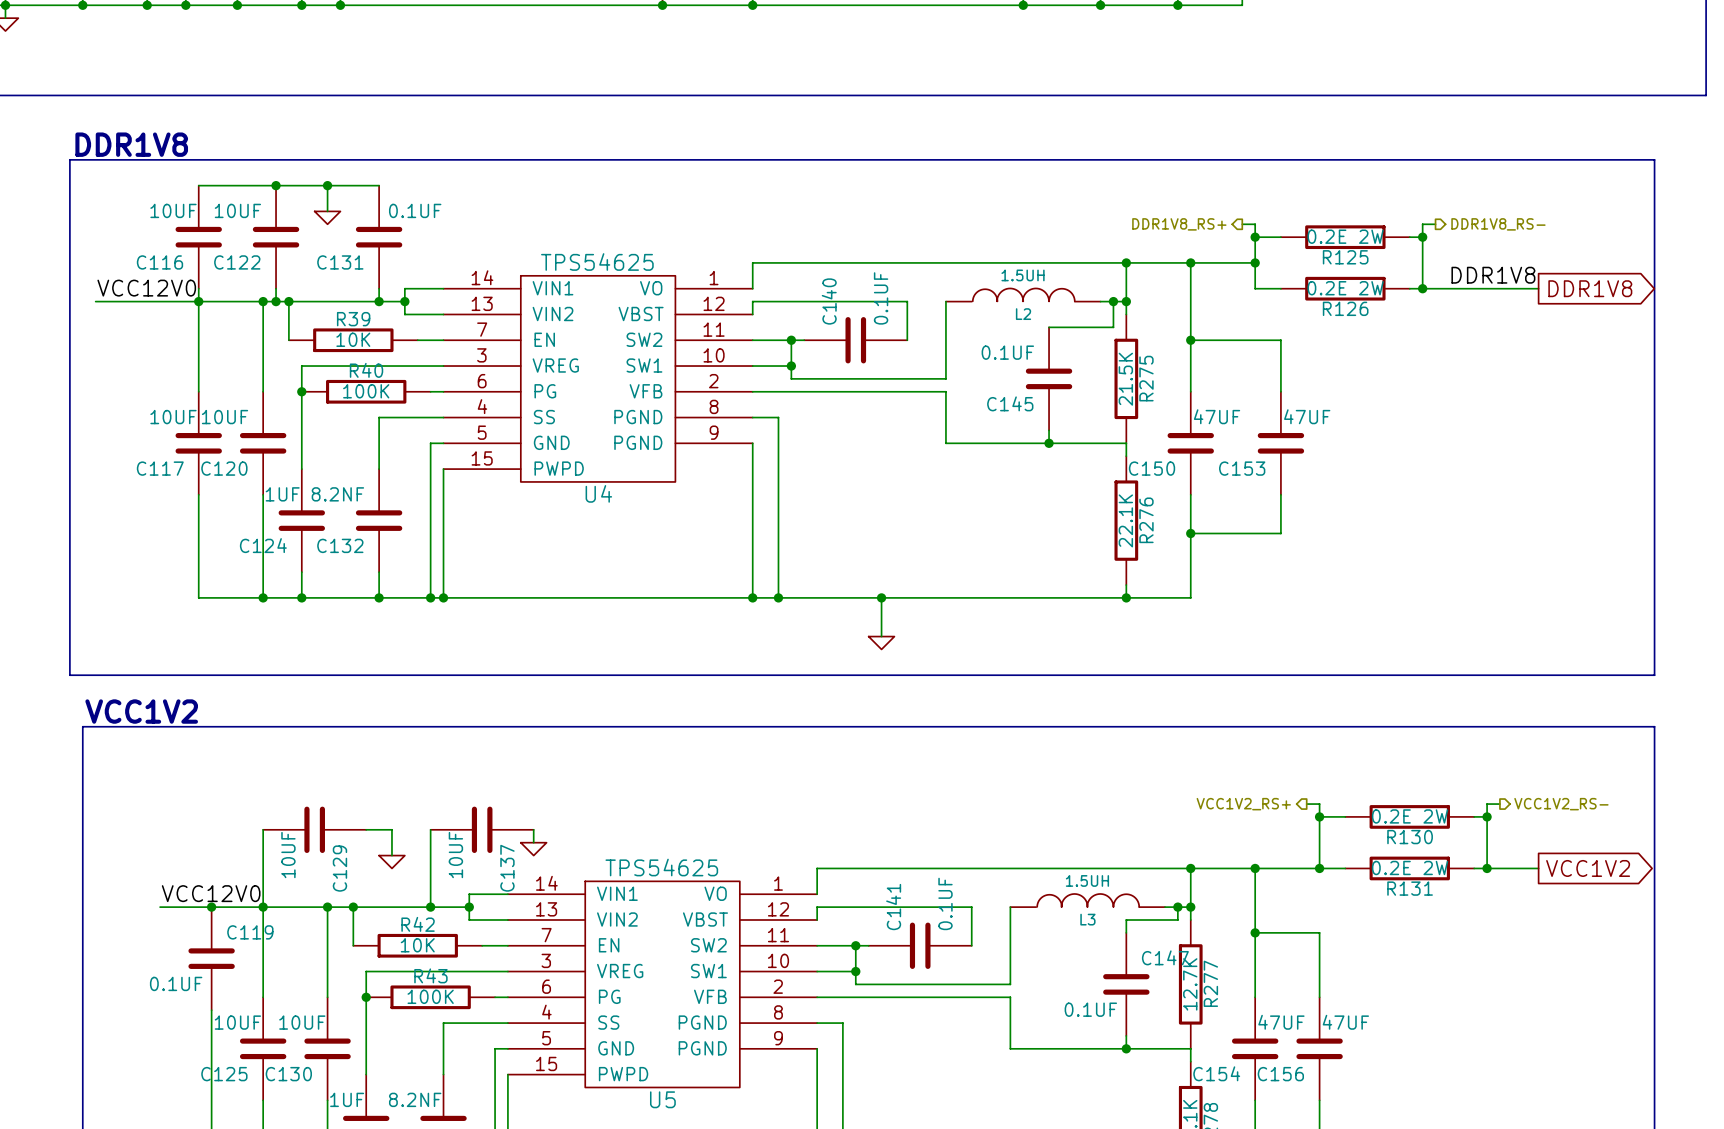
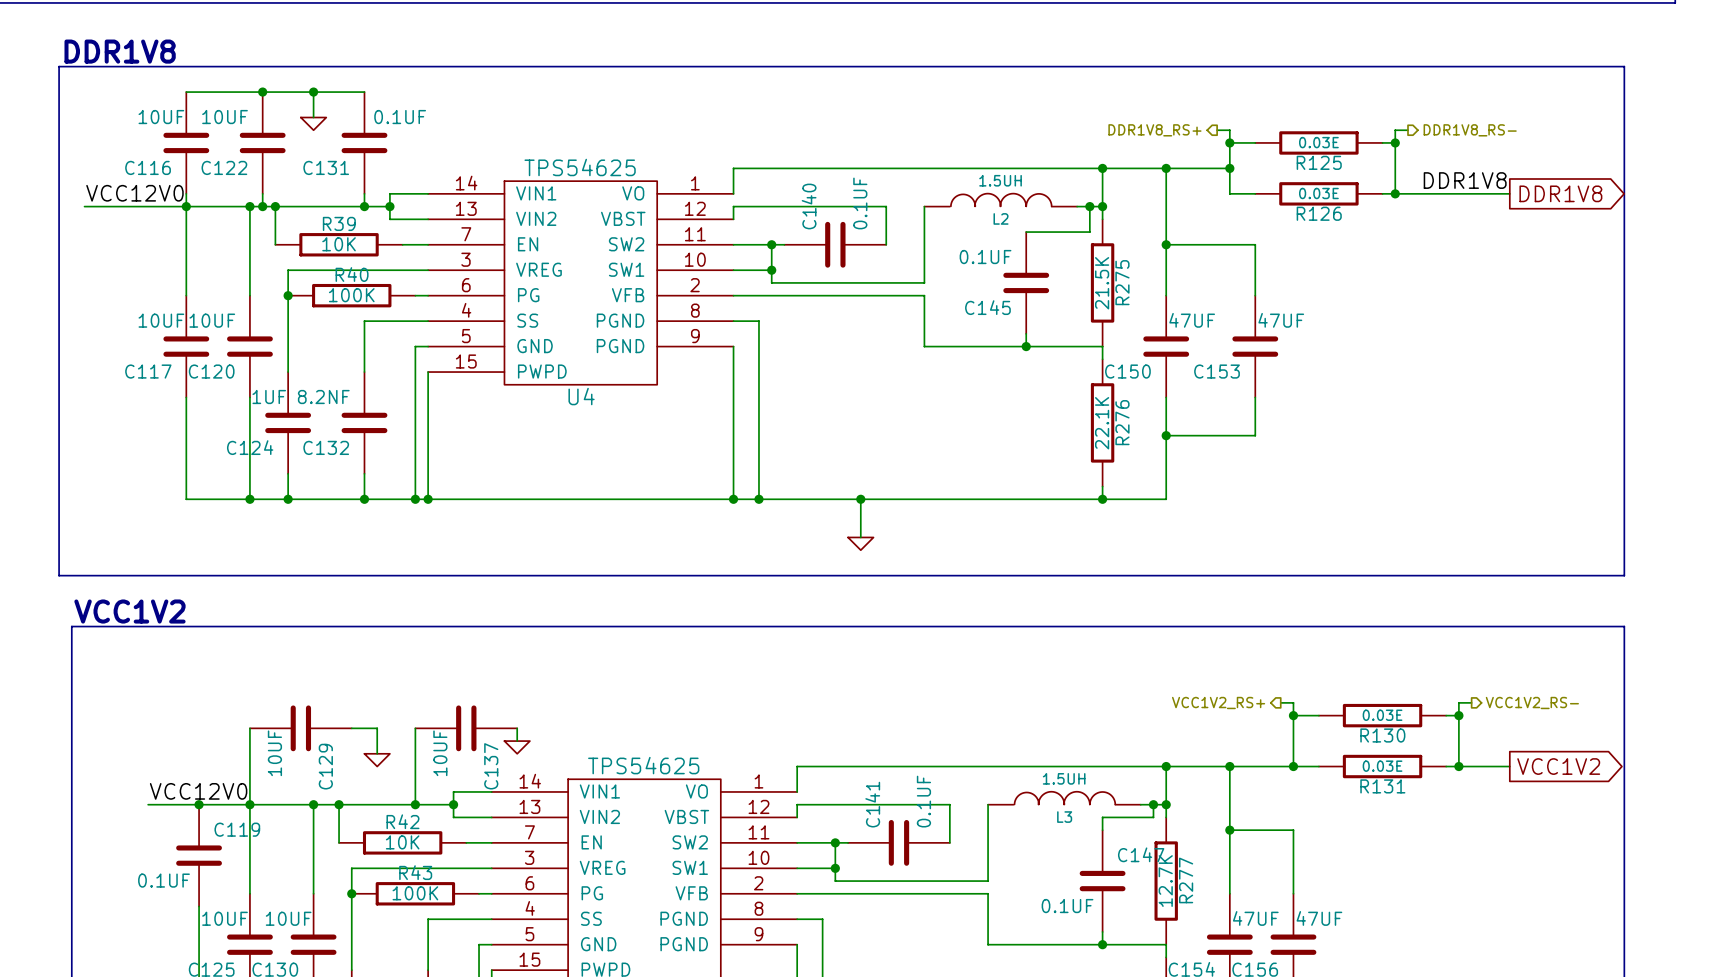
R125 value: 0.2E 2W (1345, 236) -> 0.03E (1318, 142)
R126 value: 0.2E 2W (1345, 288) -> 0.03E (1318, 193)
R130 value: 0.2E 2W (1410, 816) -> 0.03E (1382, 715)
R131 value: 0.2E 2W (1410, 867) -> 0.03E (1382, 766)

